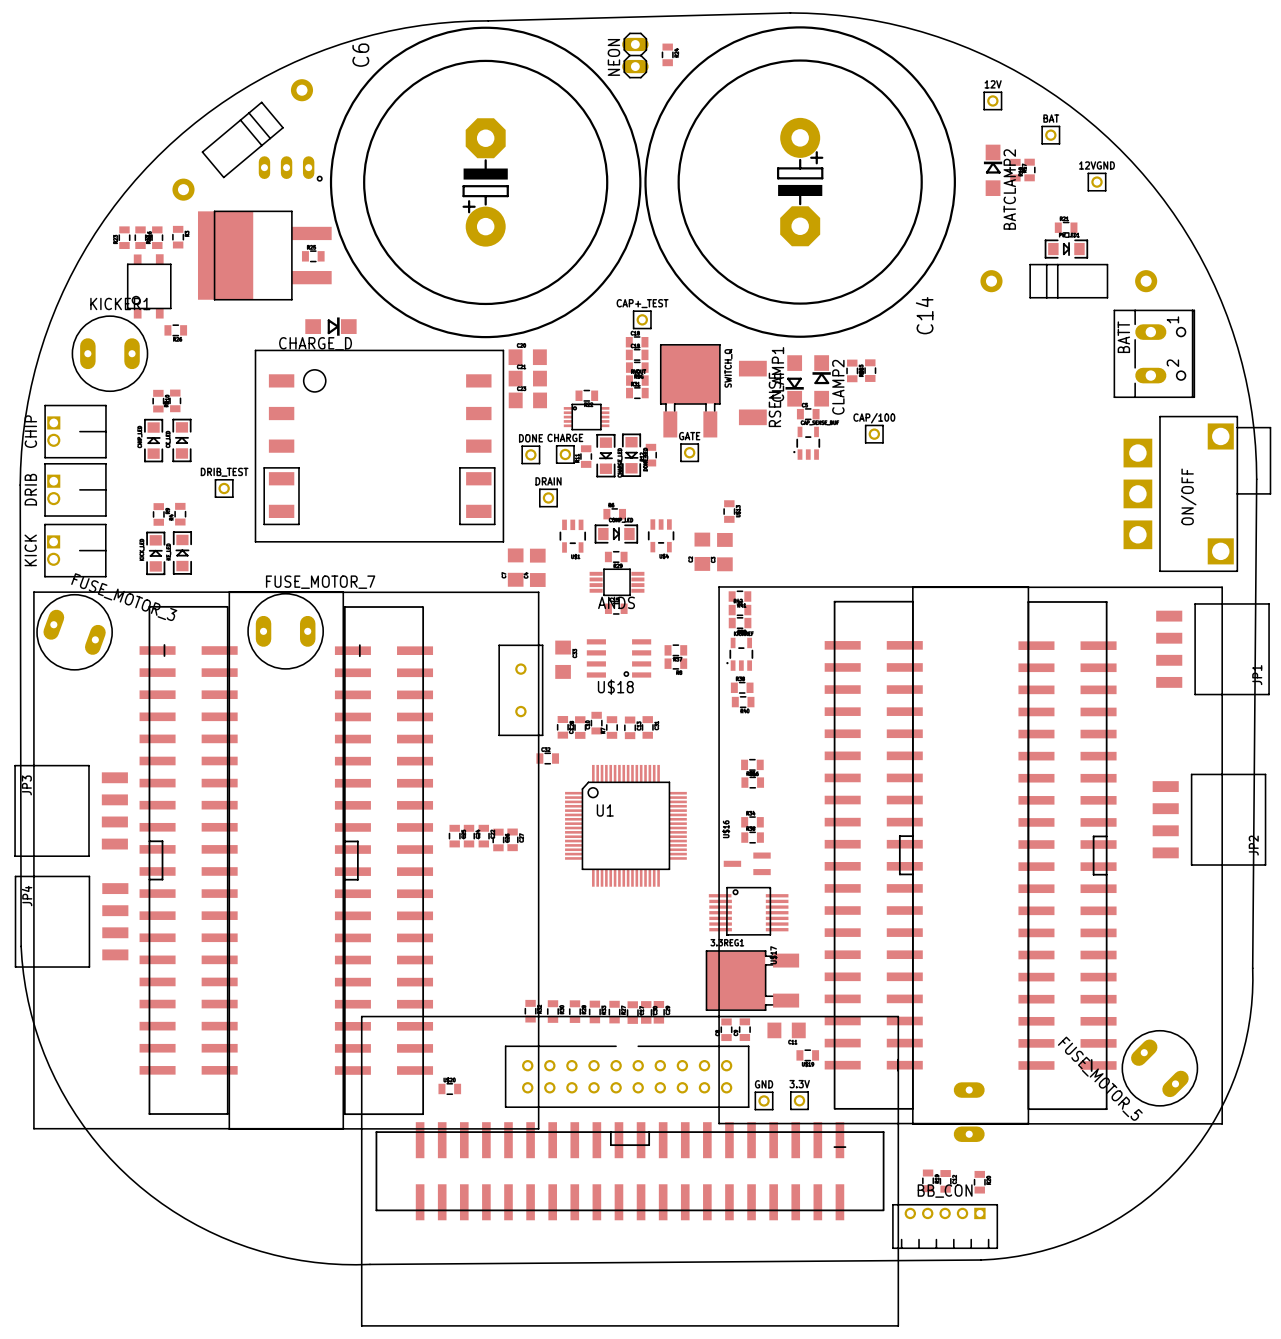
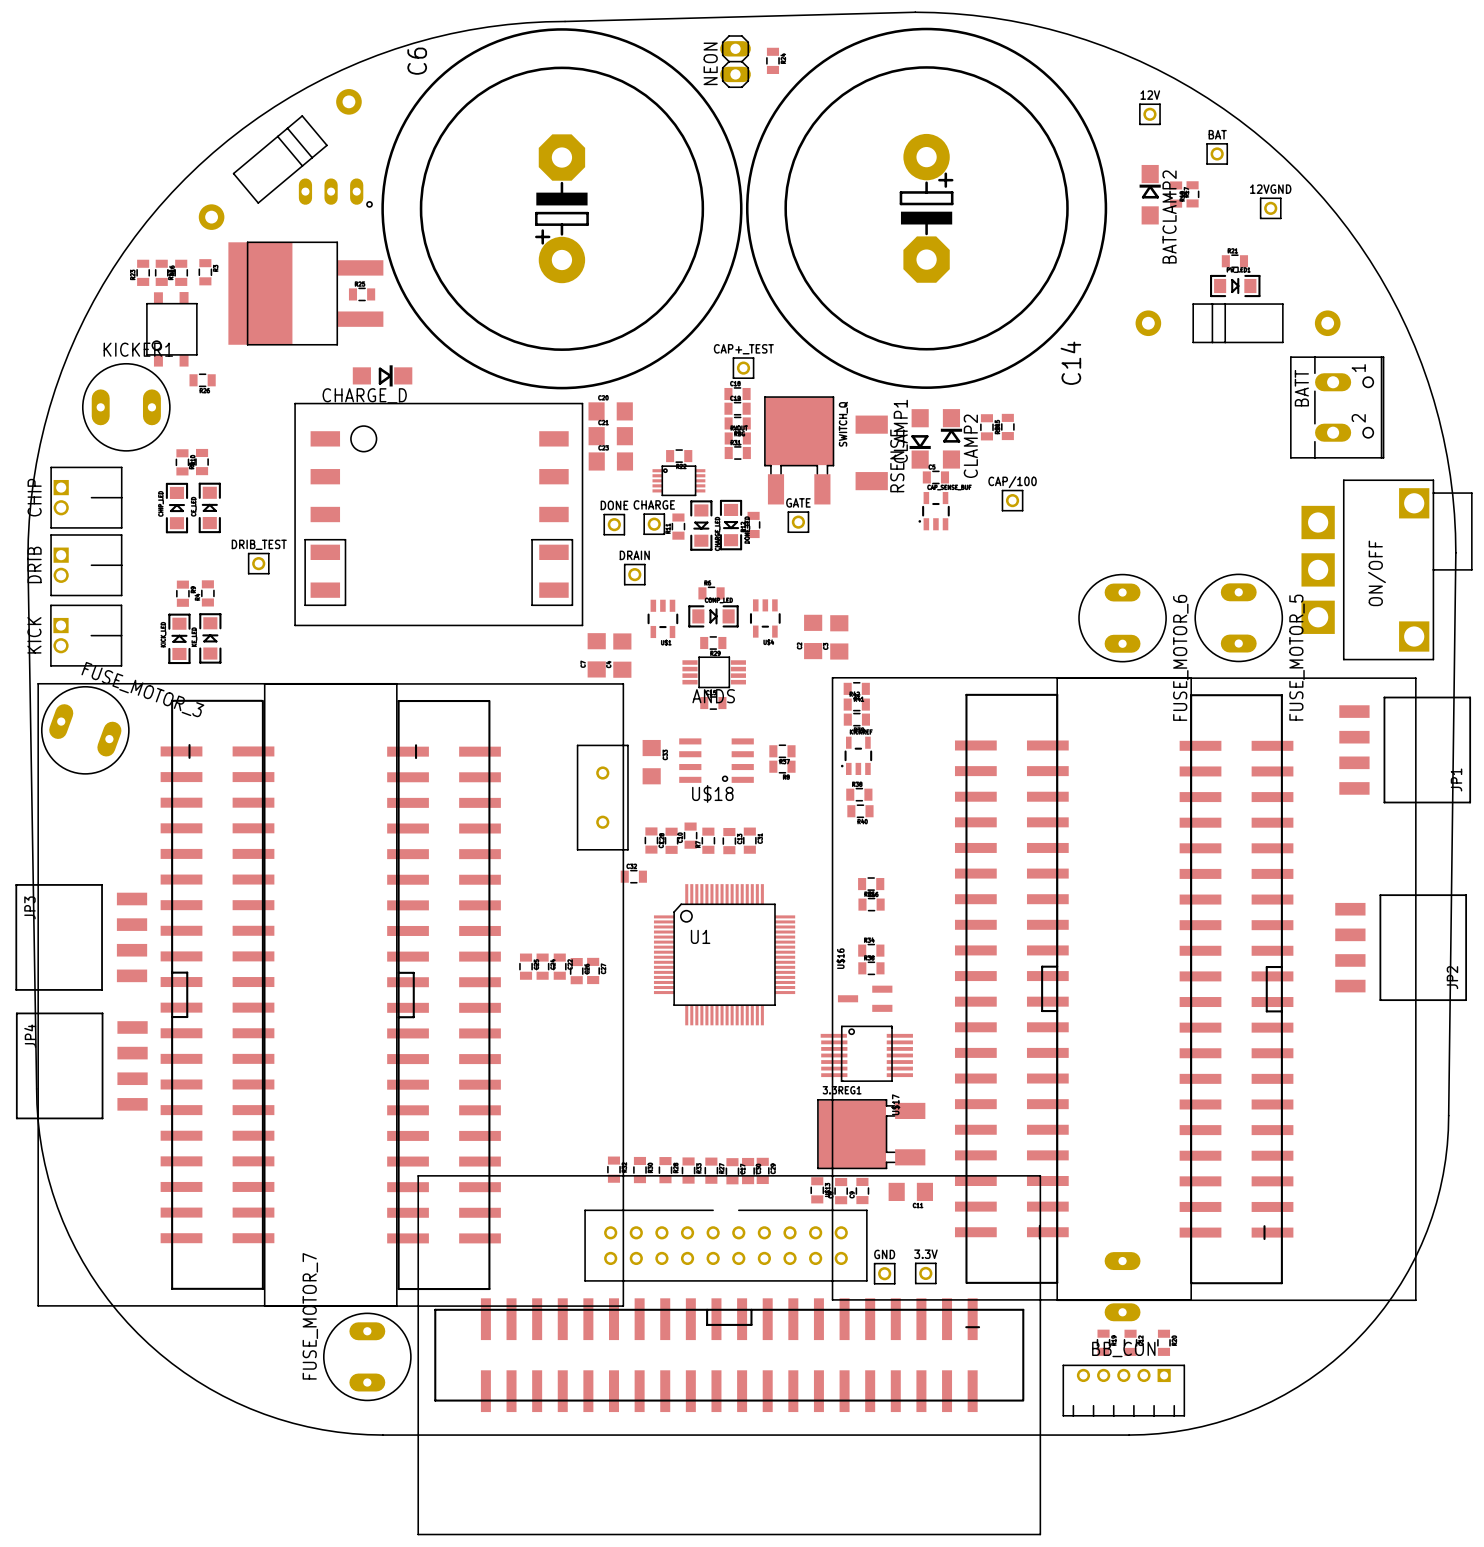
board edge: (488, 20) (455, 21) (405, 27) (341, 44) (279, 69) (250, 85) (208, 112) (158, 156) (124, 193) (104, 219) (86, 247) (63, 291) (44, 337) (35, 369) (25, 418) (20, 485) (21, 946) (25, 987) (31, 1014) (44, 1053) (55, 1079) (76, 1114) (92, 1137) (119, 1168) (150, 1195) (185, 1218) (221, 1237) (260, 1251) (301, 1260) (342, 1264) (981, 1260) (1030, 1253) (1065, 1243) (1099, 1229) (1130, 1210) (1168, 1179) (1185, 1161) (1207, 1131) (1230, 1088) (1242, 1053) (1248, 1029) (1252, 980) (1256, 479) -> (565, 21) (507, 24) (469, 30) (413, 43) (377, 55) (341, 70) (290, 96) (228, 140) (185, 178) (159, 206) (113, 268) (76, 335) (61, 370) (44, 425) (33, 482) (27, 558) (36, 1104) (41, 1149) (52, 1193) (62, 1221) (83, 1262) (99, 1287) (127, 1322) (148, 1344) (184, 1372) (209, 1388) (236, 1402) (278, 1419) (322, 1429) (367, 1434) (1129, 1435) (1173, 1431) (1216, 1422) (1258, 1407) (1309, 1379) (1355, 1341) (1375, 1319) (1400, 1283) (1427, 1231) (1443, 1174) (1448, 1115) (1455, 552)
part position: (729, 511) -> (817, 1190)
FUSE_MOTOR_6: none -> (1122, 618)
FUSE_MOTOR_7 name position: FUSE_MOTOR_7 (320, 582) -> FUSE_MOTOR_7 (310, 1316)
FUSE_MOTOR_7 rotation: 0° (285, 631) -> 90° clockwise (367, 1356)
FUSE_MOTOR_7 position: (285, 631) -> (367, 1356)
part: (807, 1055) -> none
FUSE_MOTOR_5 rotation: 0° (1159, 1068) -> 45° clockwise (1238, 617)
FUSE_MOTOR_5 position: (1159, 1068) -> (1238, 617)
FUSE_MOTOR_5 name position: FUSE_MOTOR_5 (1100, 1078) -> FUSE_MOTOR_5 (1297, 657)
part: (449, 1088) -> none
part position: (928, 1180) -> (1103, 1342)
part position: (945, 1181) -> (1130, 1342)
part position: (979, 1182) -> (1163, 1342)
BB_CON position: (945, 1226) -> (1123, 1390)

